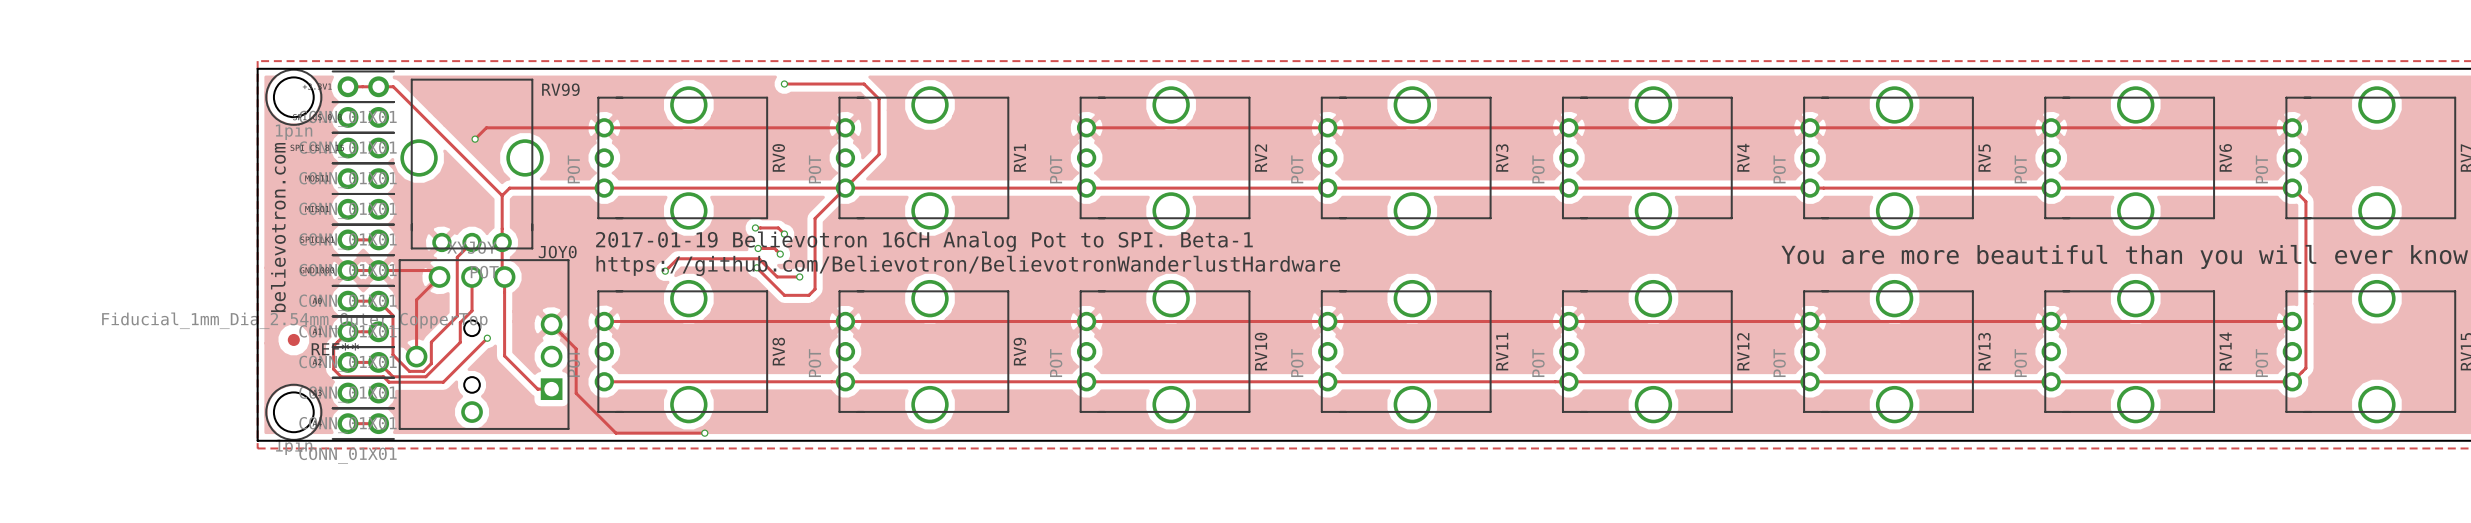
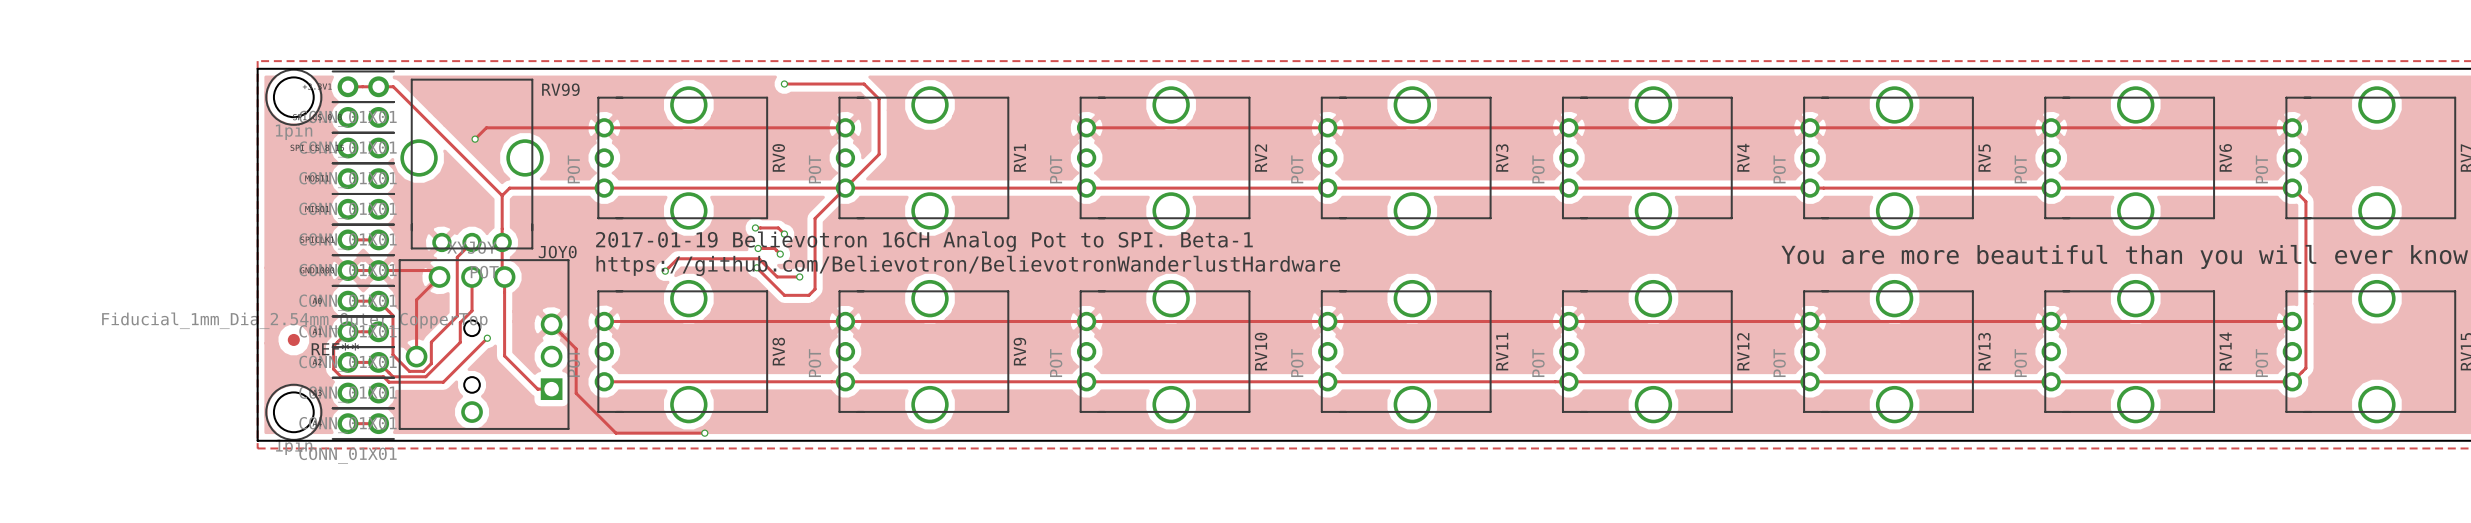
text: believotron.com (278, 227) -> none

